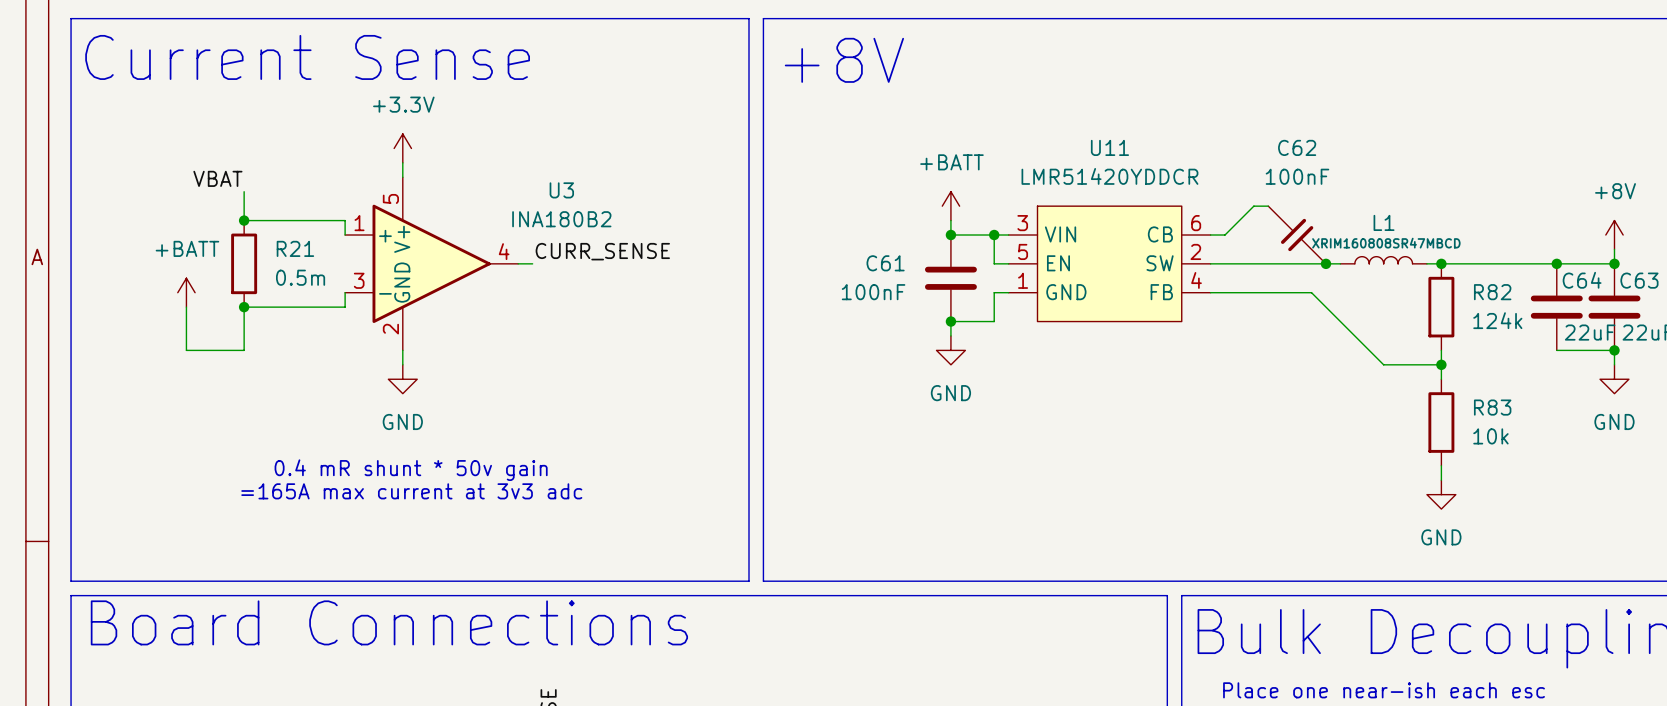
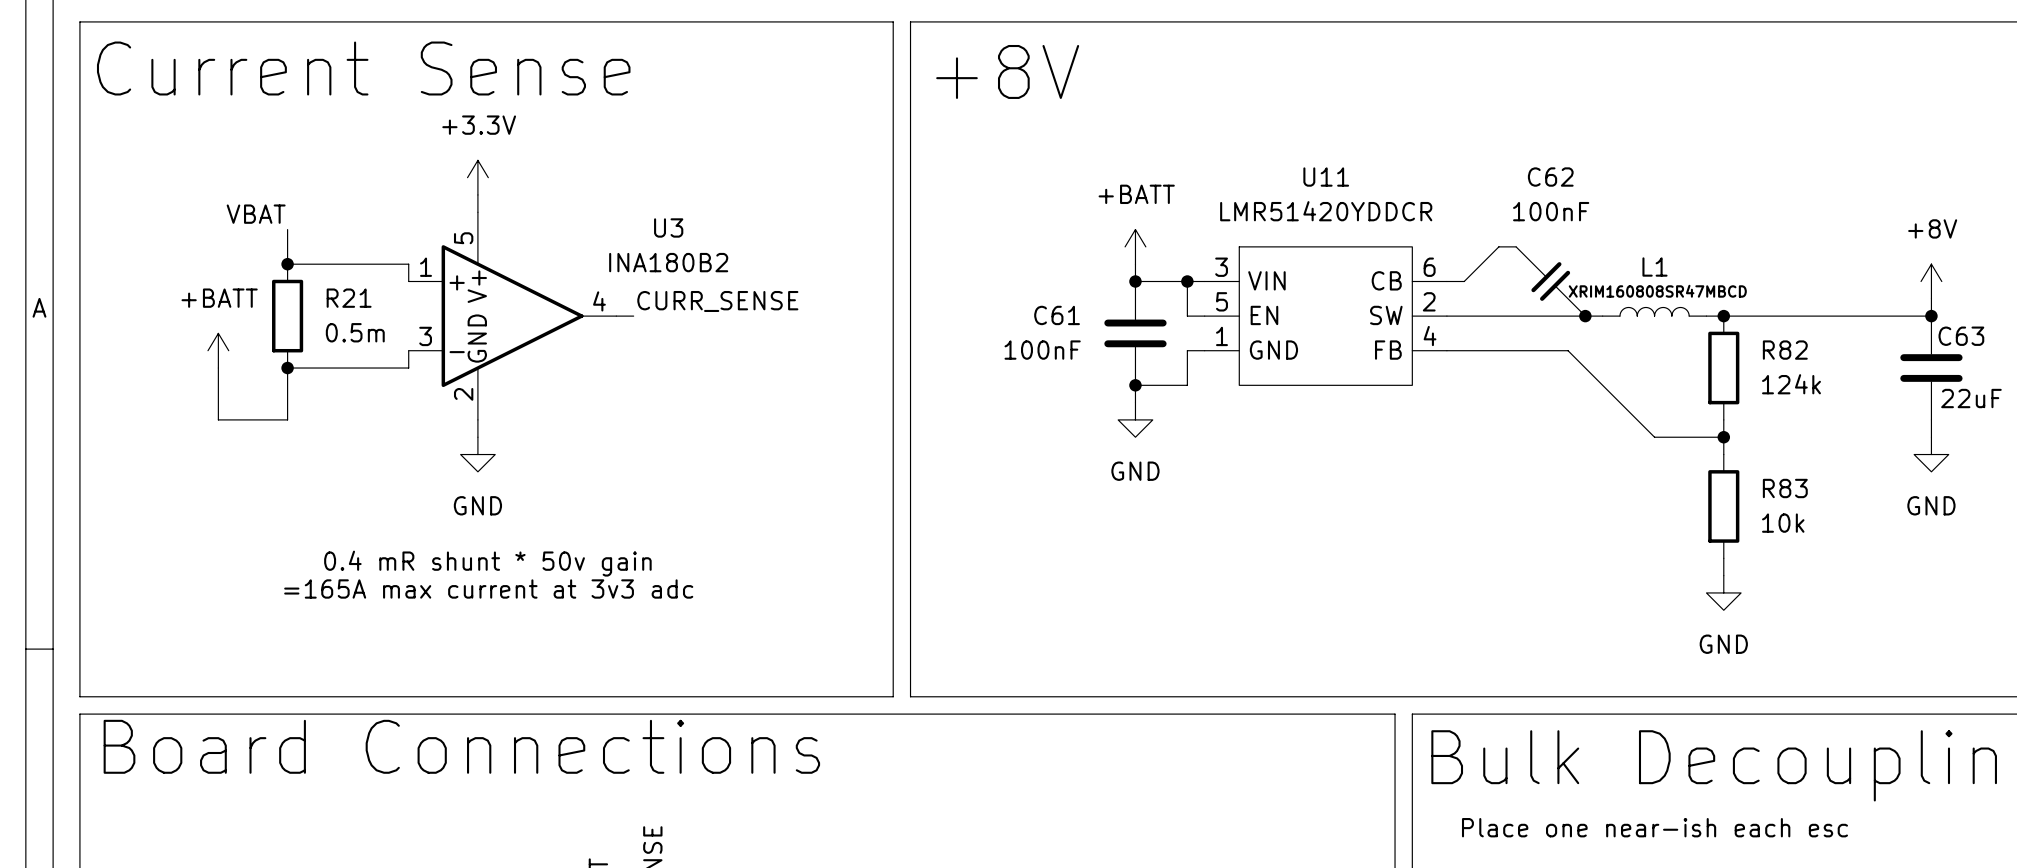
junction: (1556, 263) -> none
C64: 22uF (1556, 307) -> none
wire: (1556, 350) (1614, 350) -> none
junction: (1614, 350) -> none

